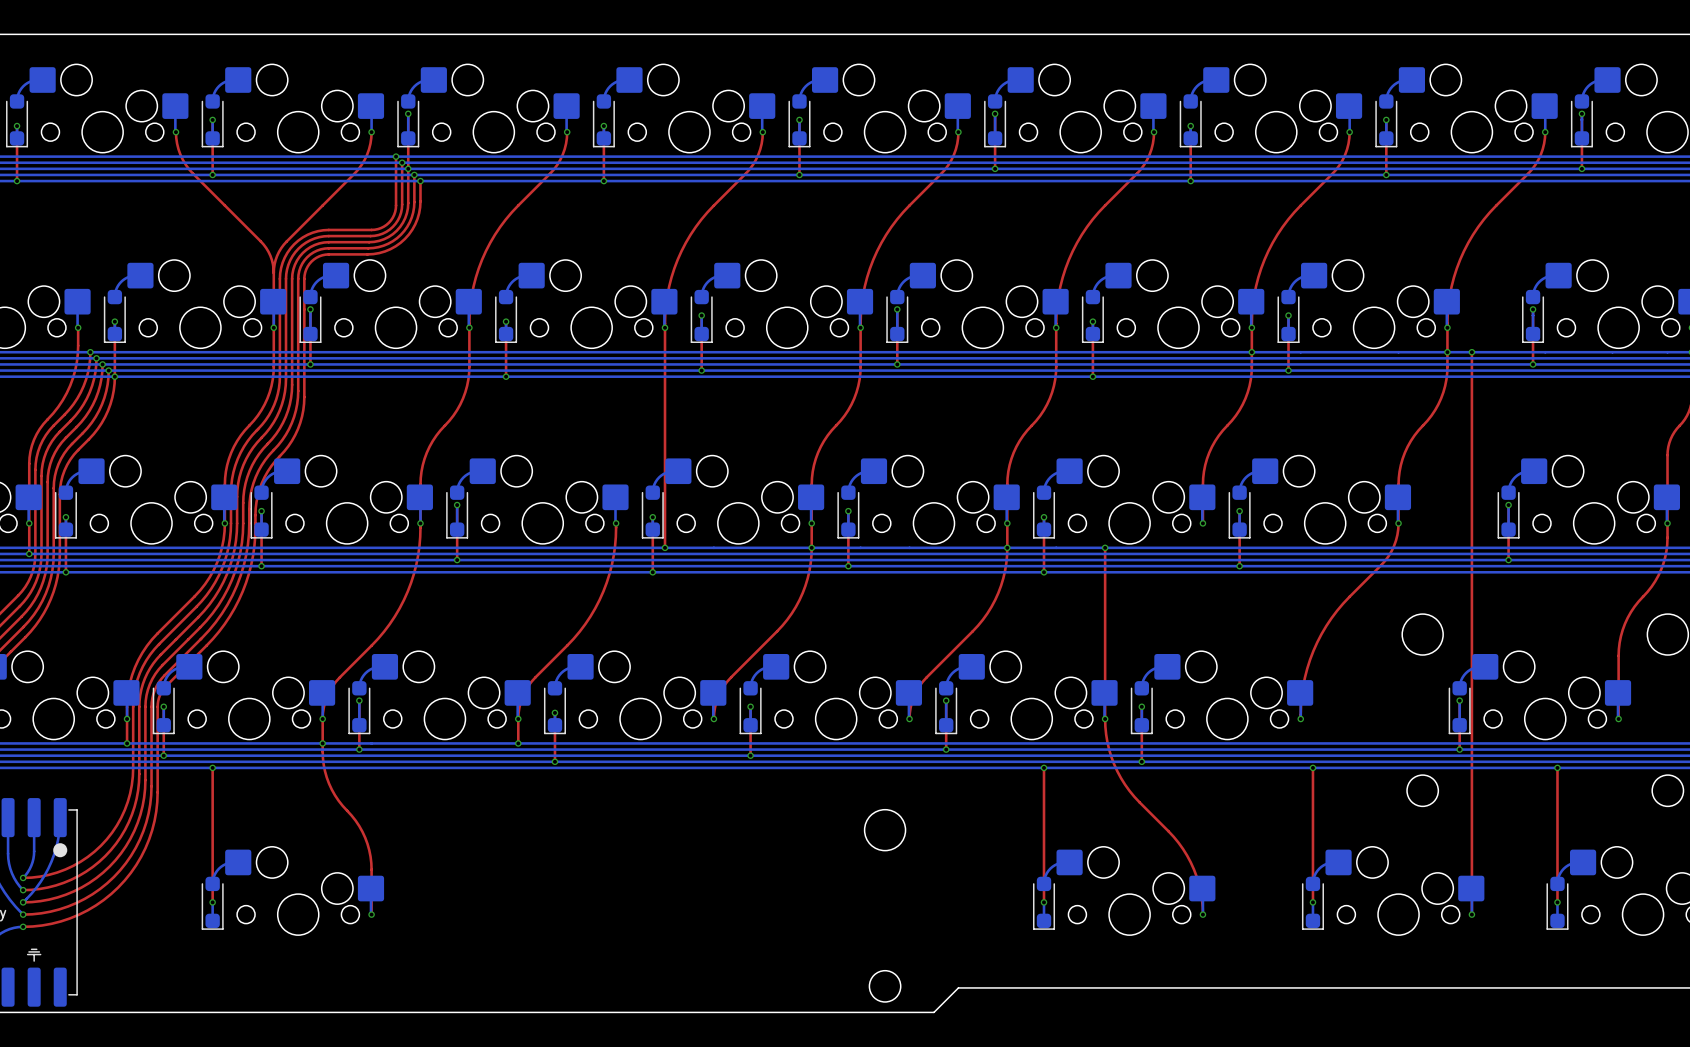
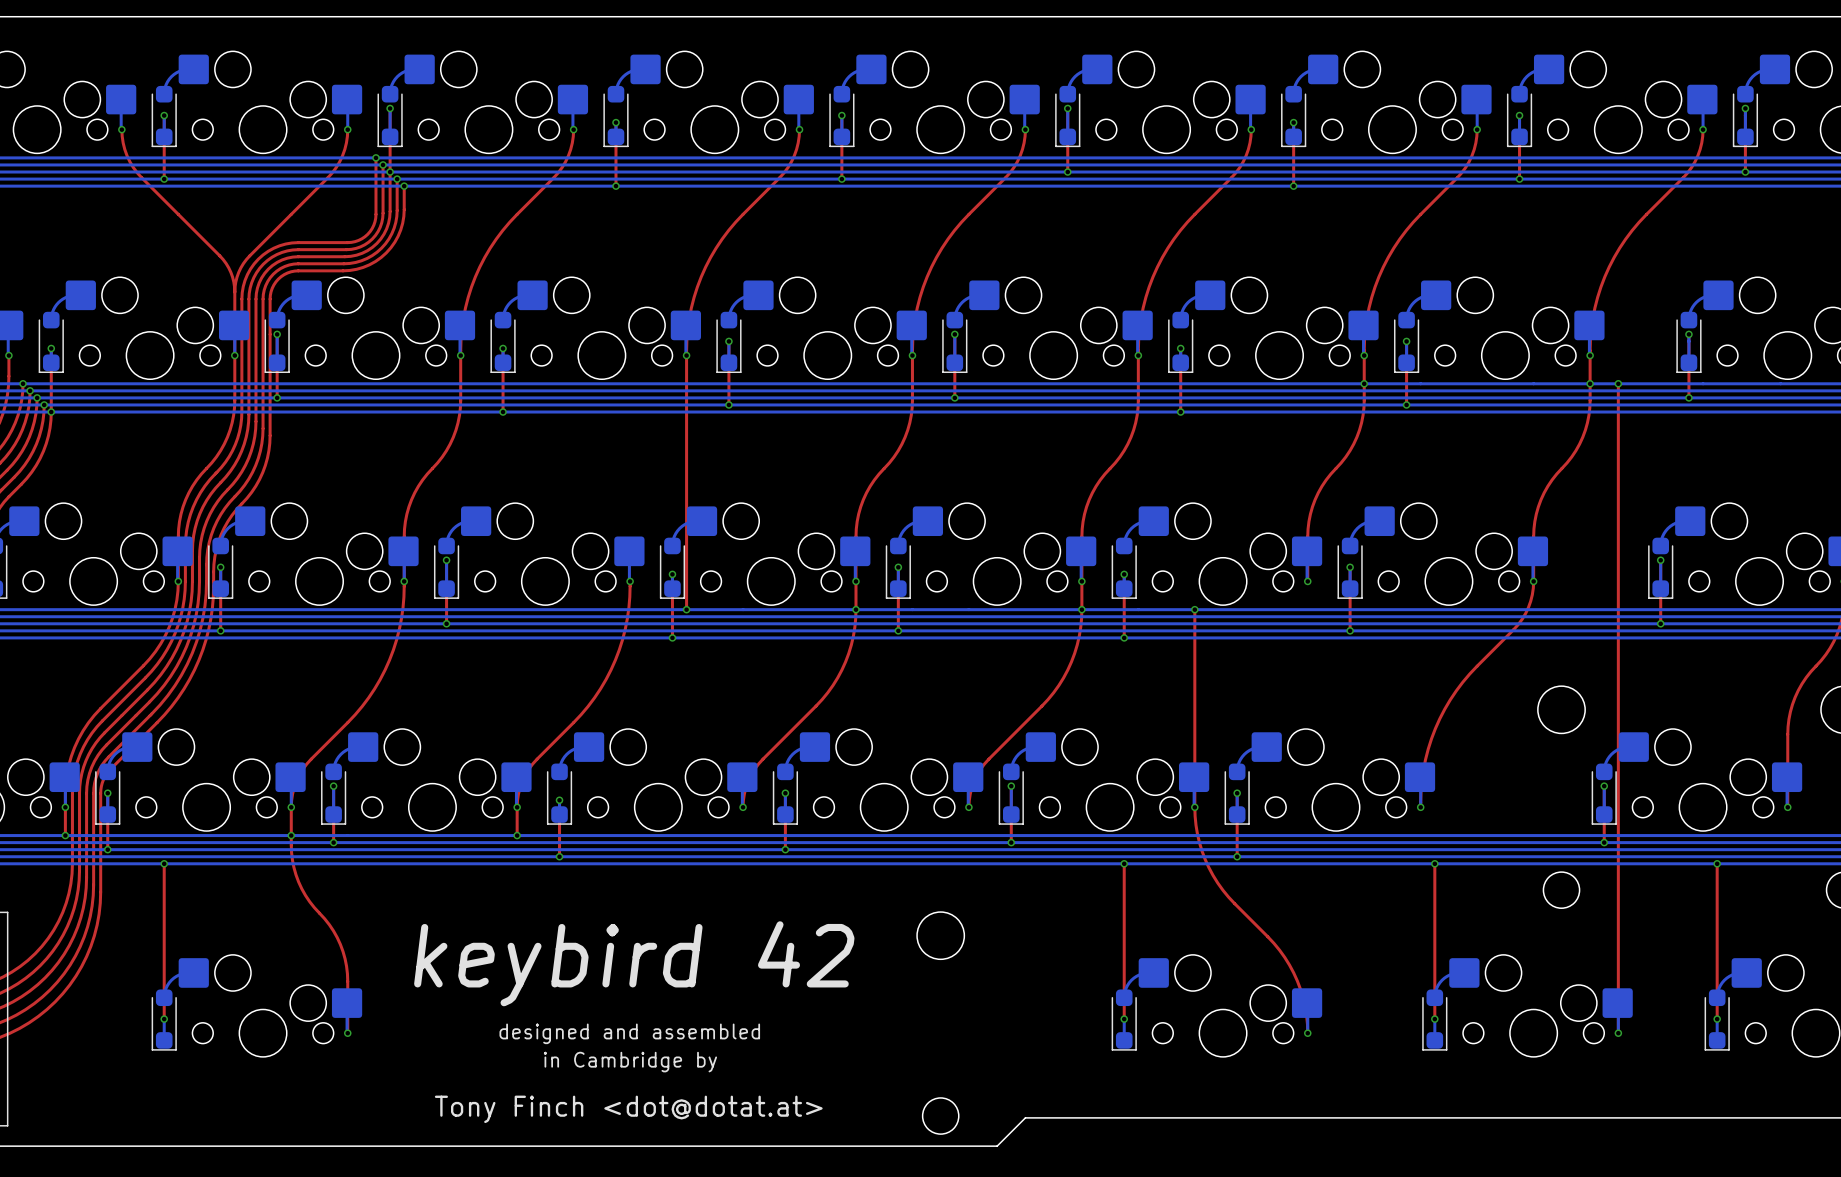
text: none -> keybird 42 (634, 963)
text: none -> designed and assembled (629, 1033)
text: none -> in Cambridge by (630, 1062)
text: none -> Tony Finch <dot@dotat.at> (628, 1109)

